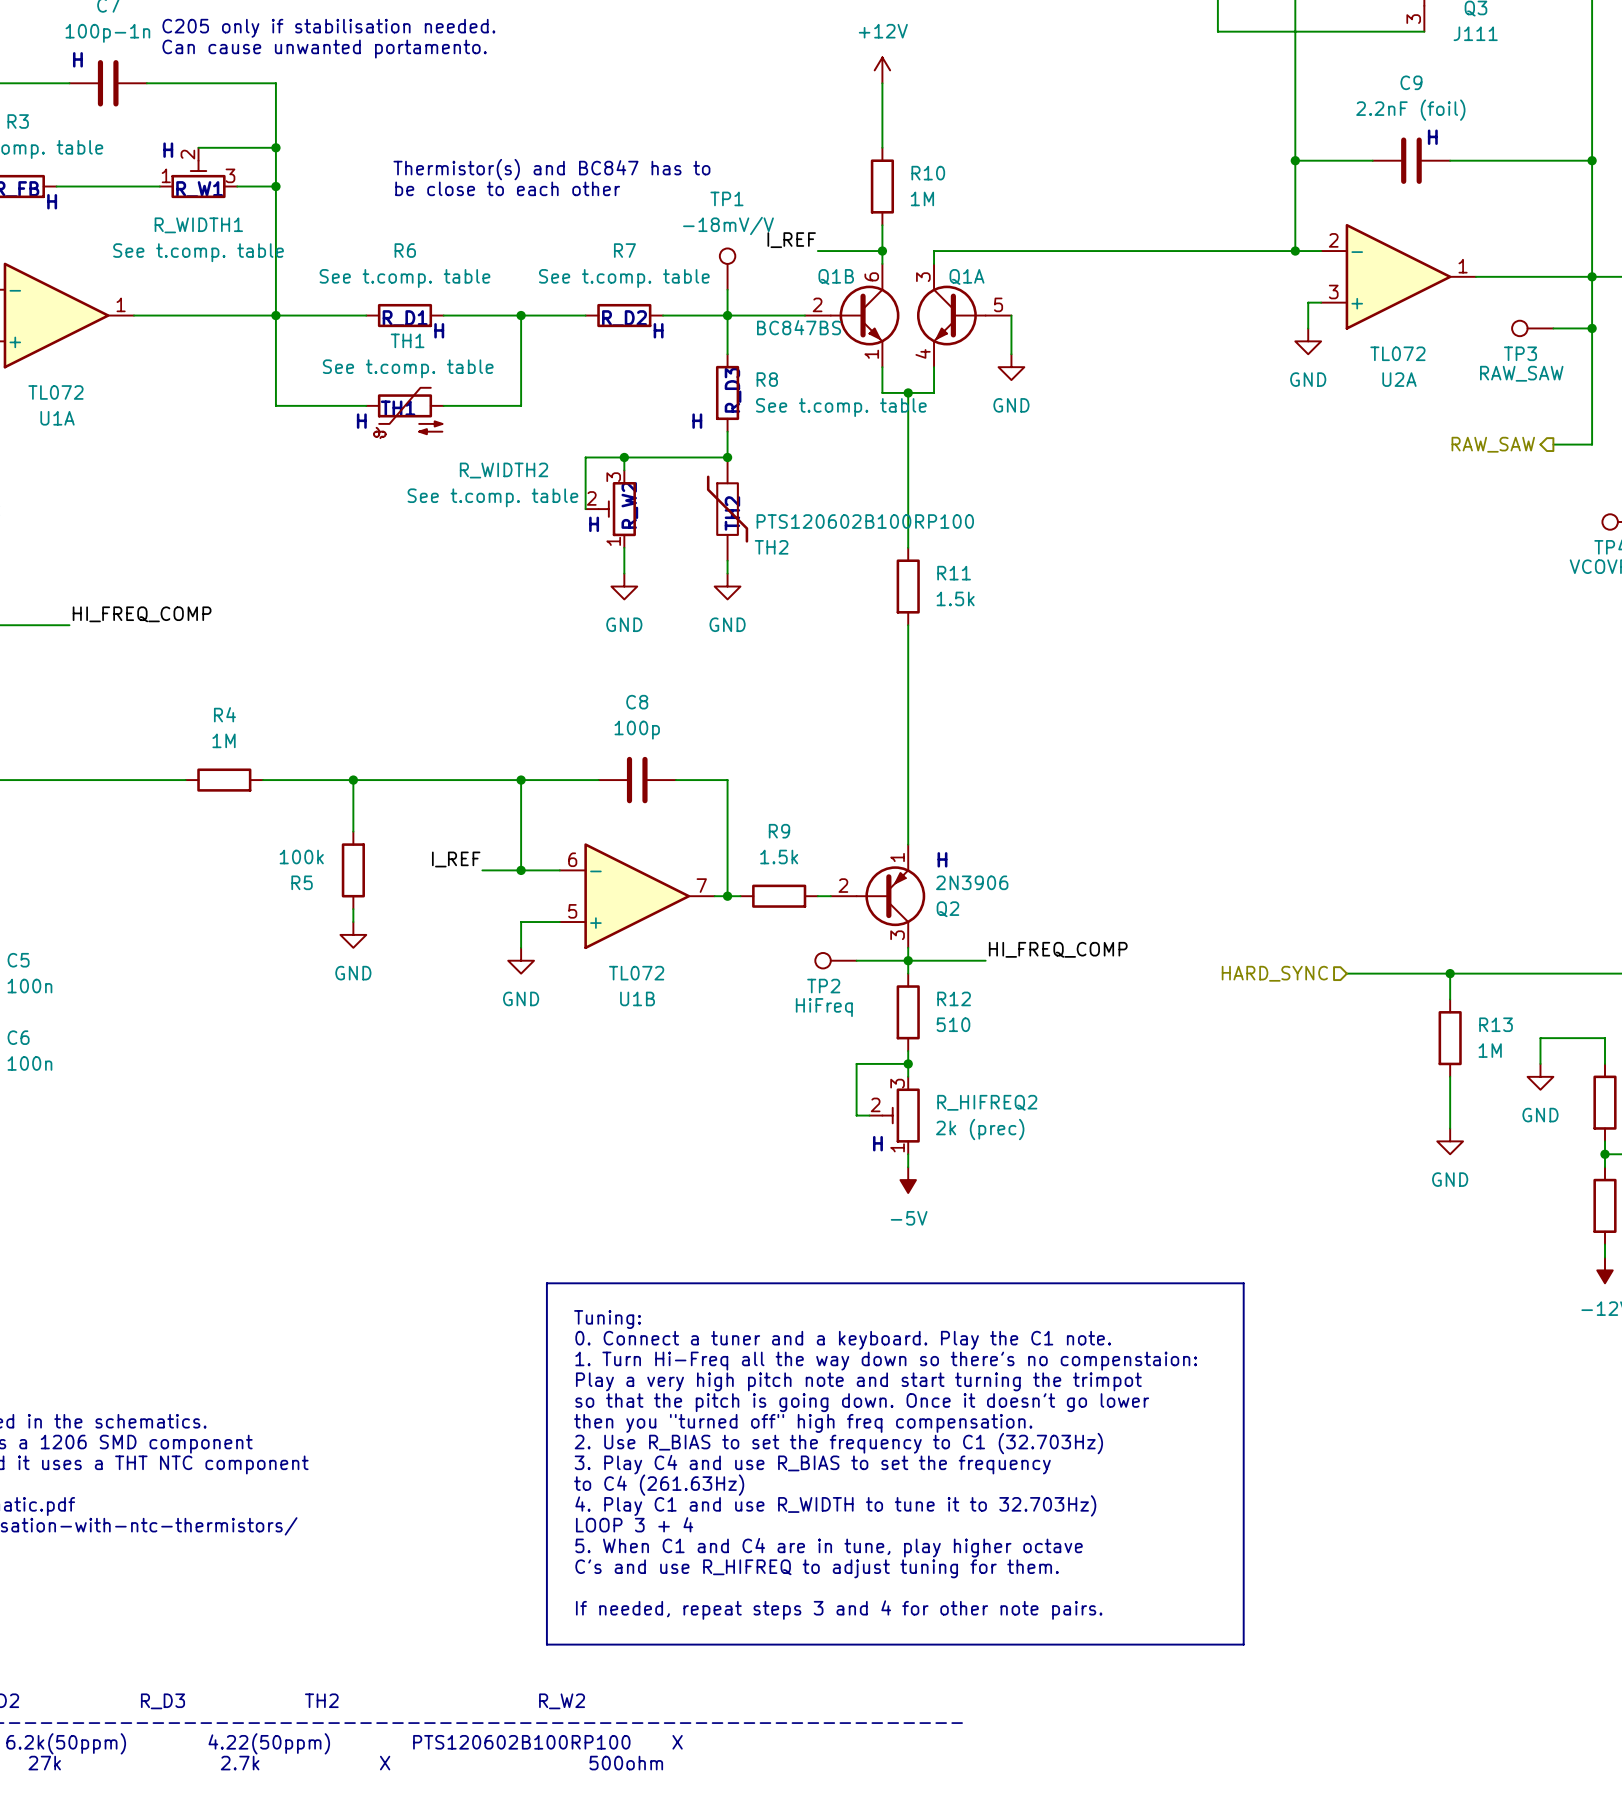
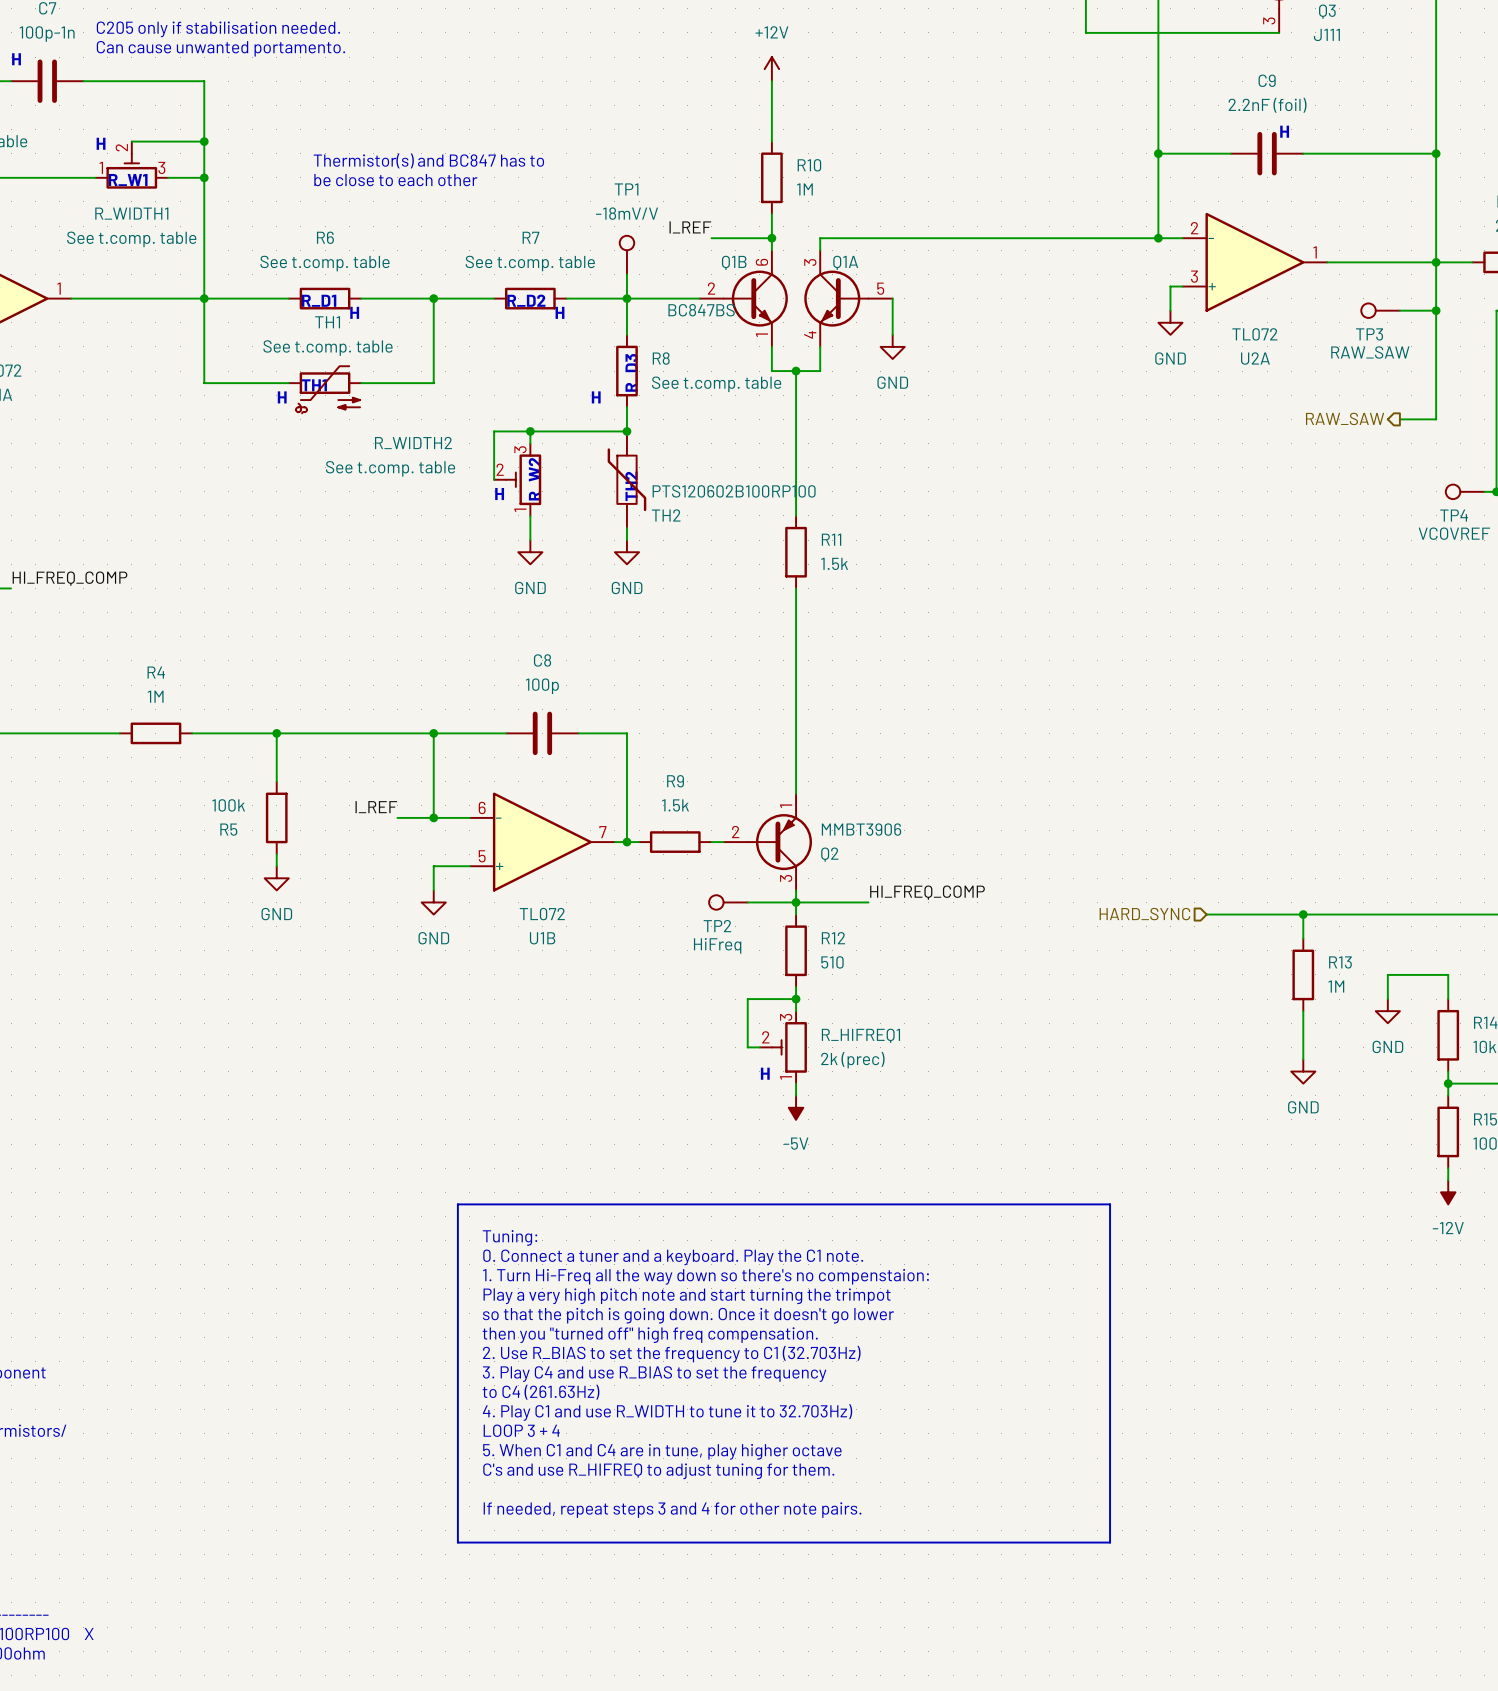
text: H (942, 859) -> none
Q2 value: 2N3906 (972, 882) -> MMBT3906 (861, 829)
R_HIFREQ2 name: R_HIFREQ2 (987, 1102) -> R_HIFREQ1 (860, 1035)

